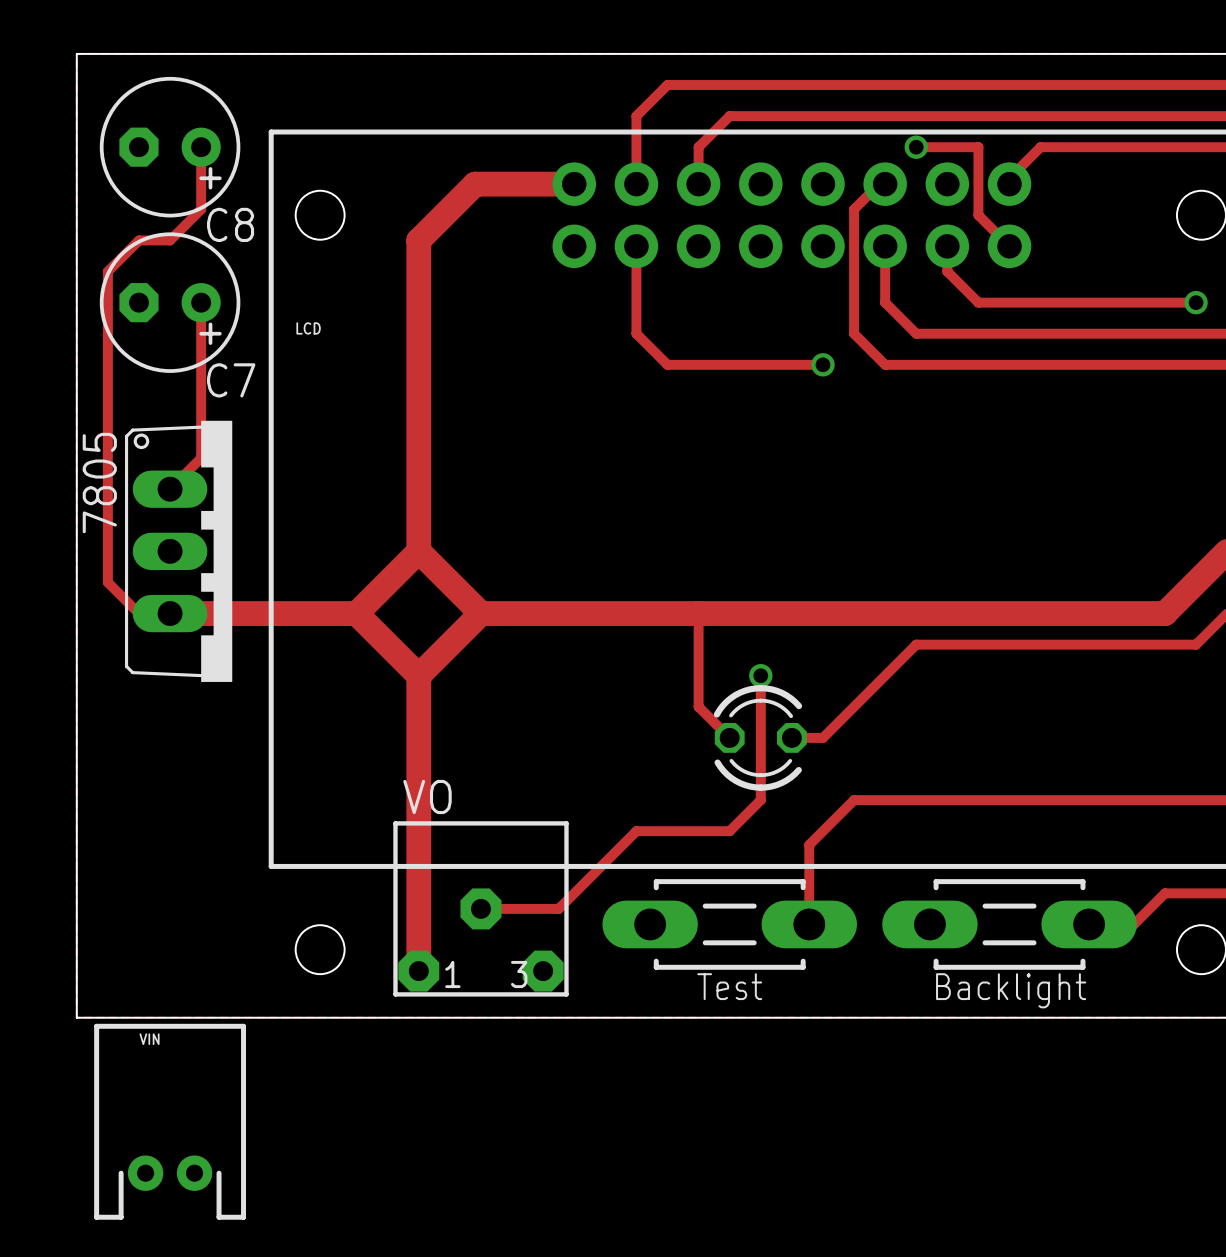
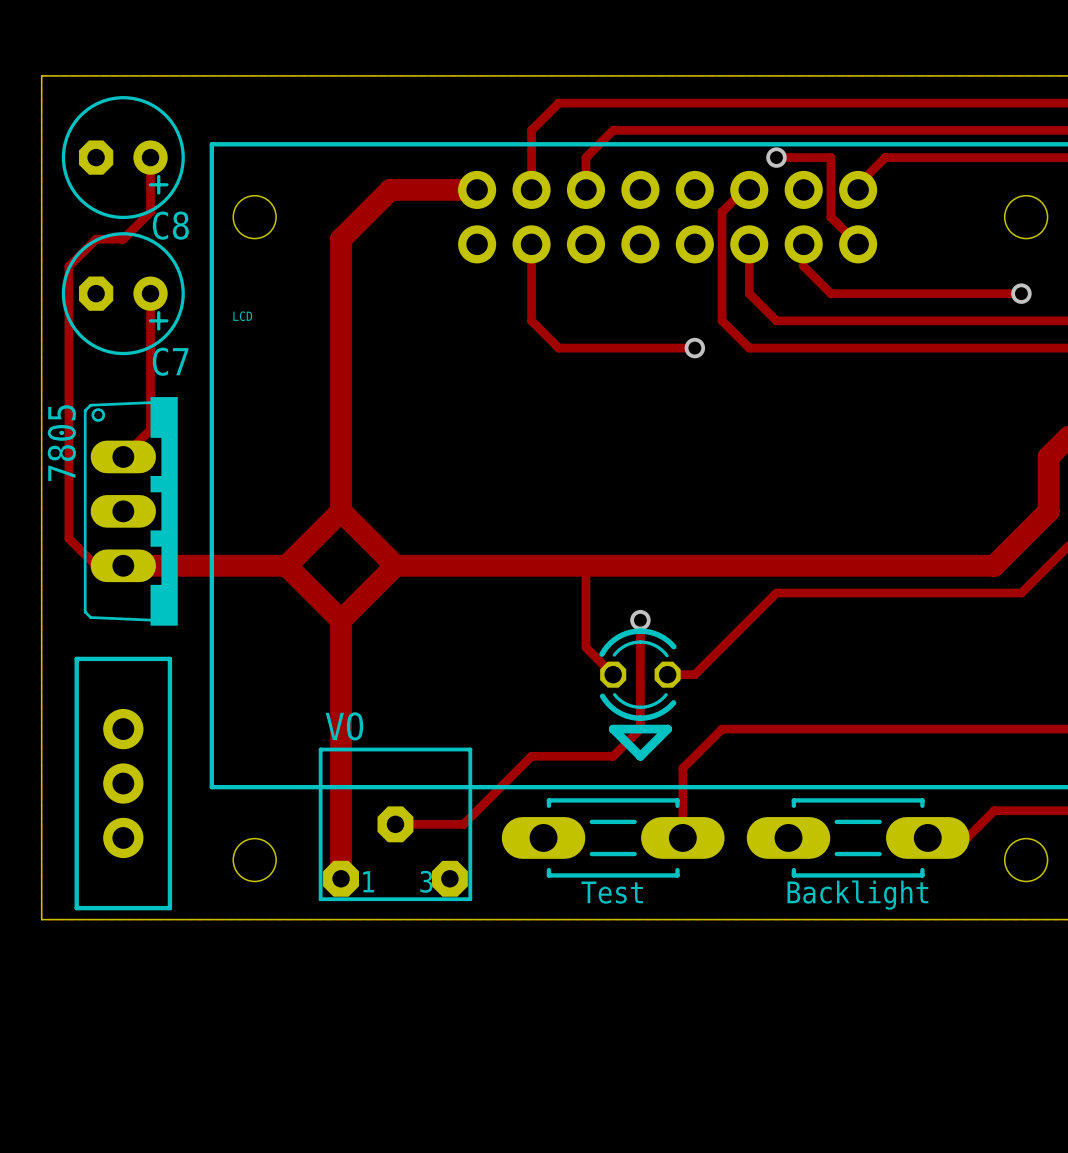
line: none -> (613, 729) (667, 729) (640, 756) (613, 729)
part: none -> (123, 783)
VIN: (170, 1121) -> none

